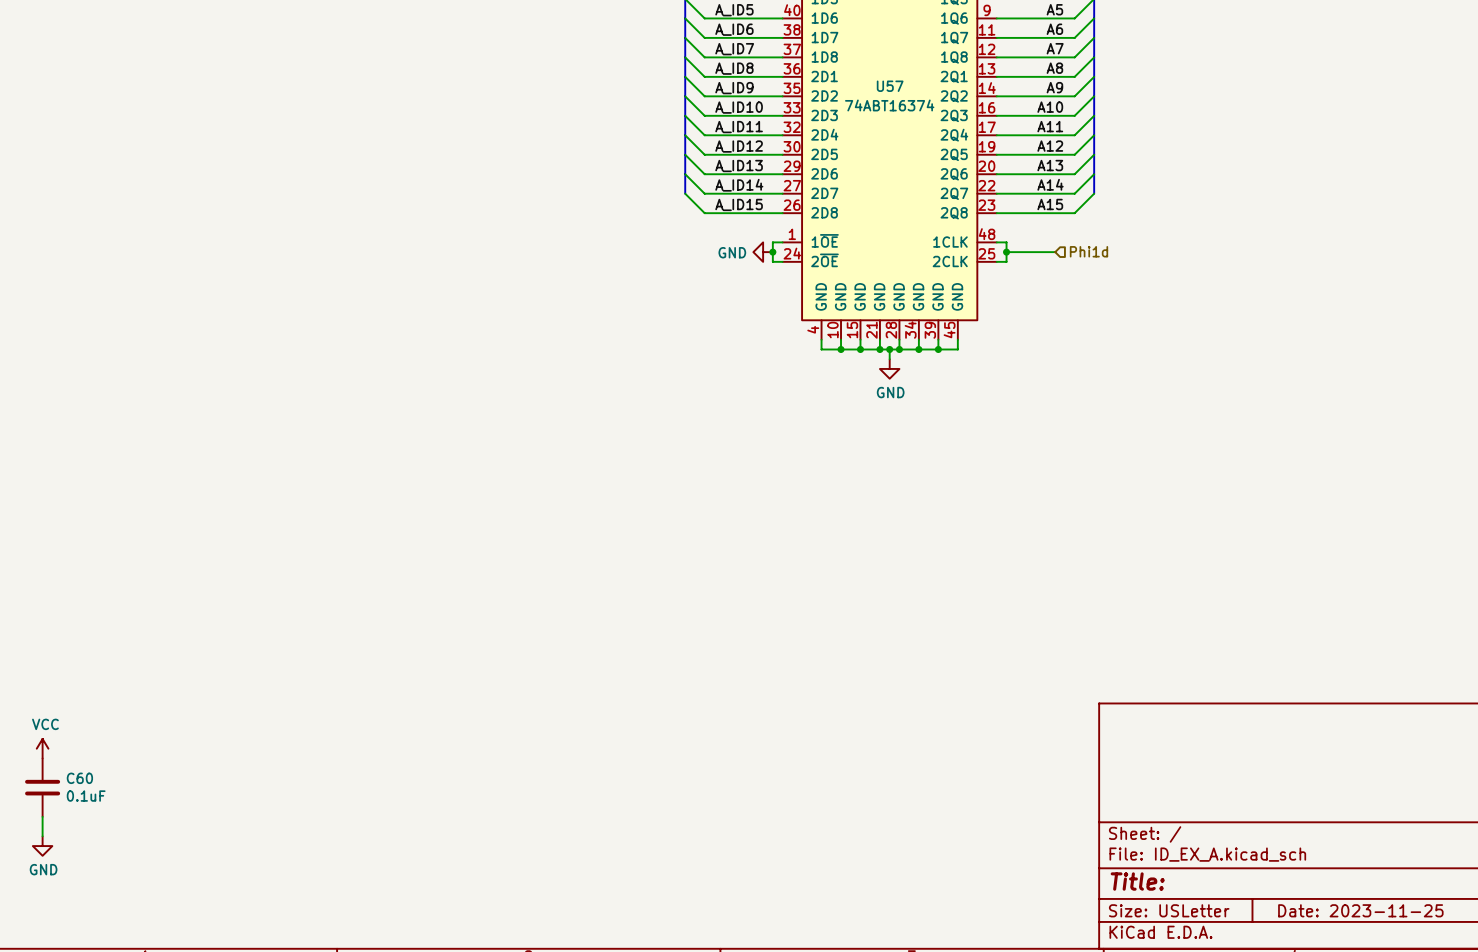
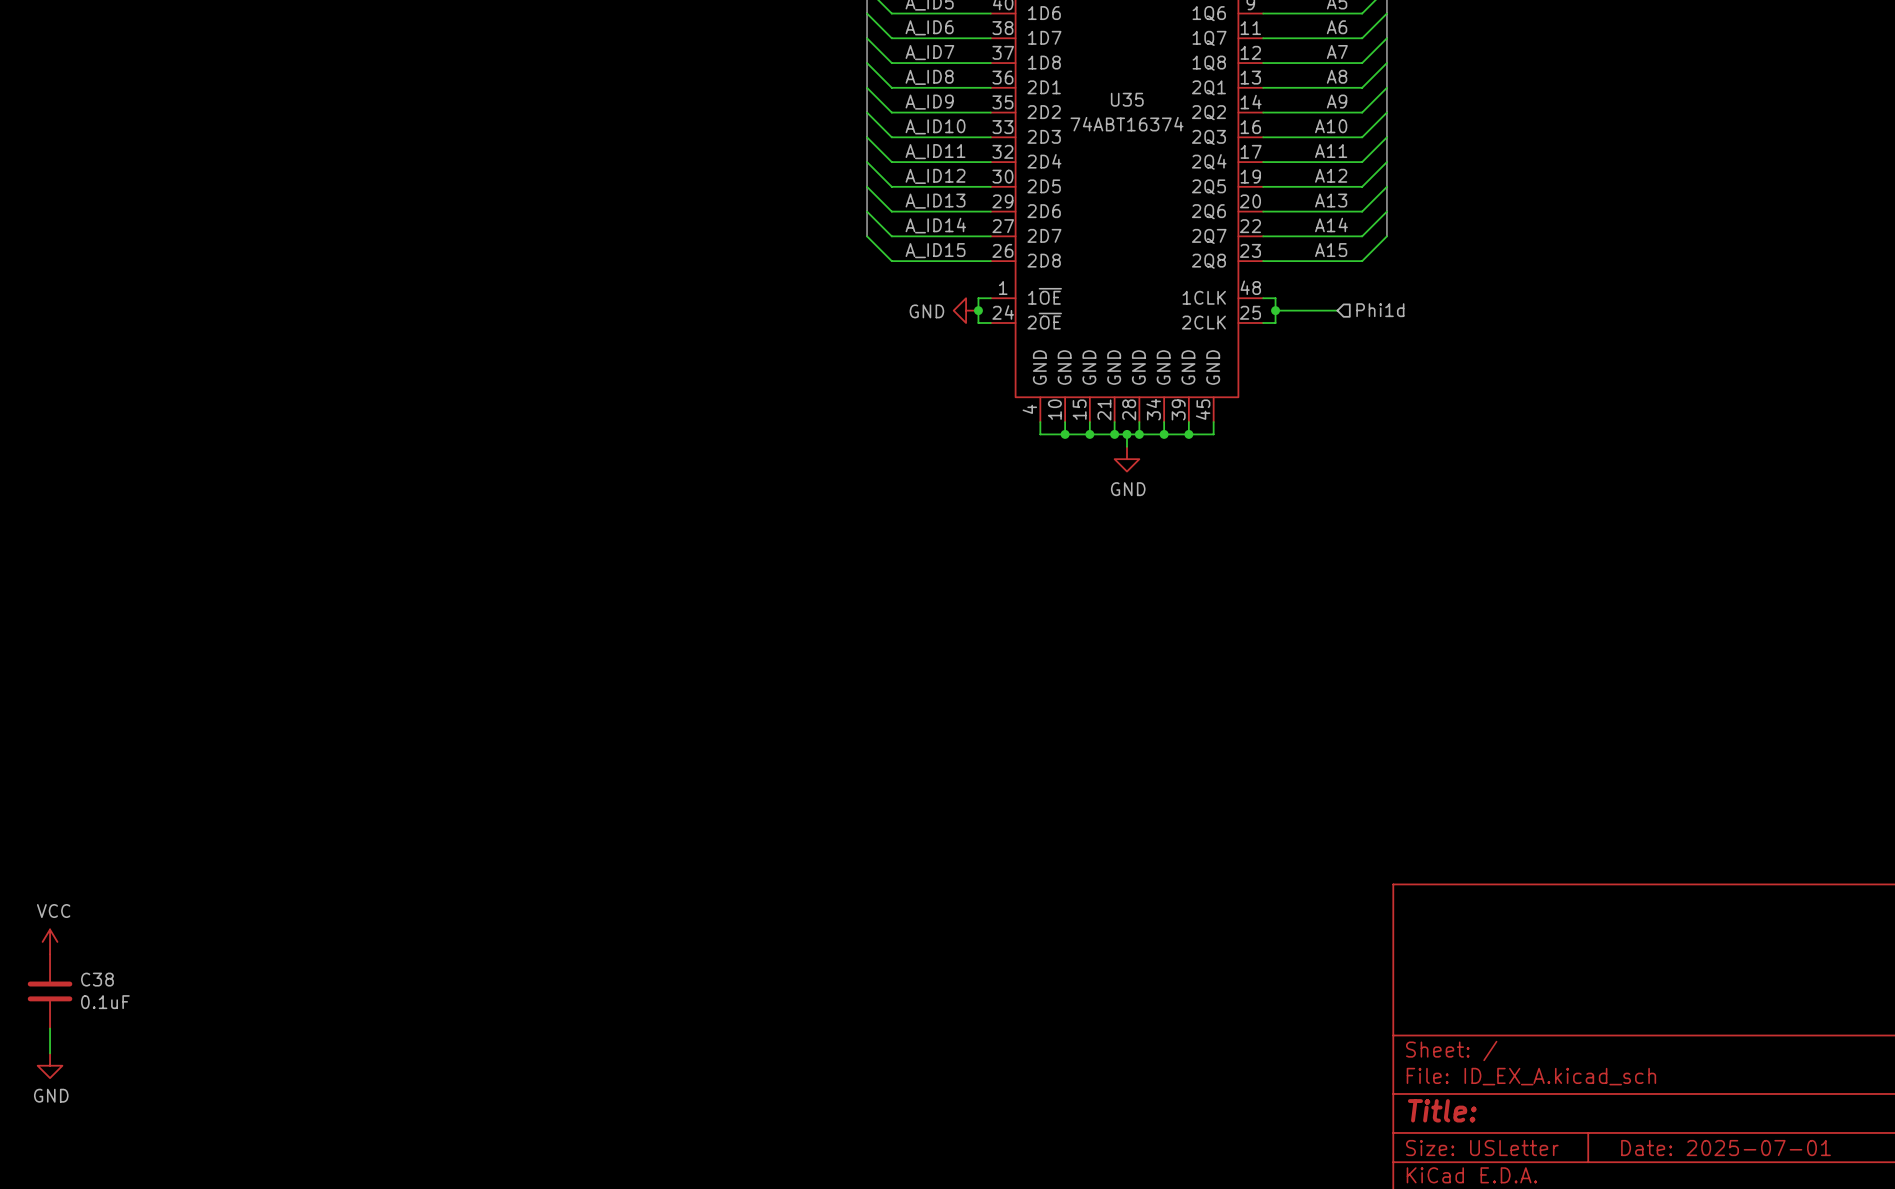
U57 name: U57 (890, 86) -> U35 (1127, 99)
C60 name: C60 (79, 778) -> C38 (97, 979)
title block: Date: 2023-11-25 (1360, 910) -> Date: 2025-07-01 (1726, 1148)

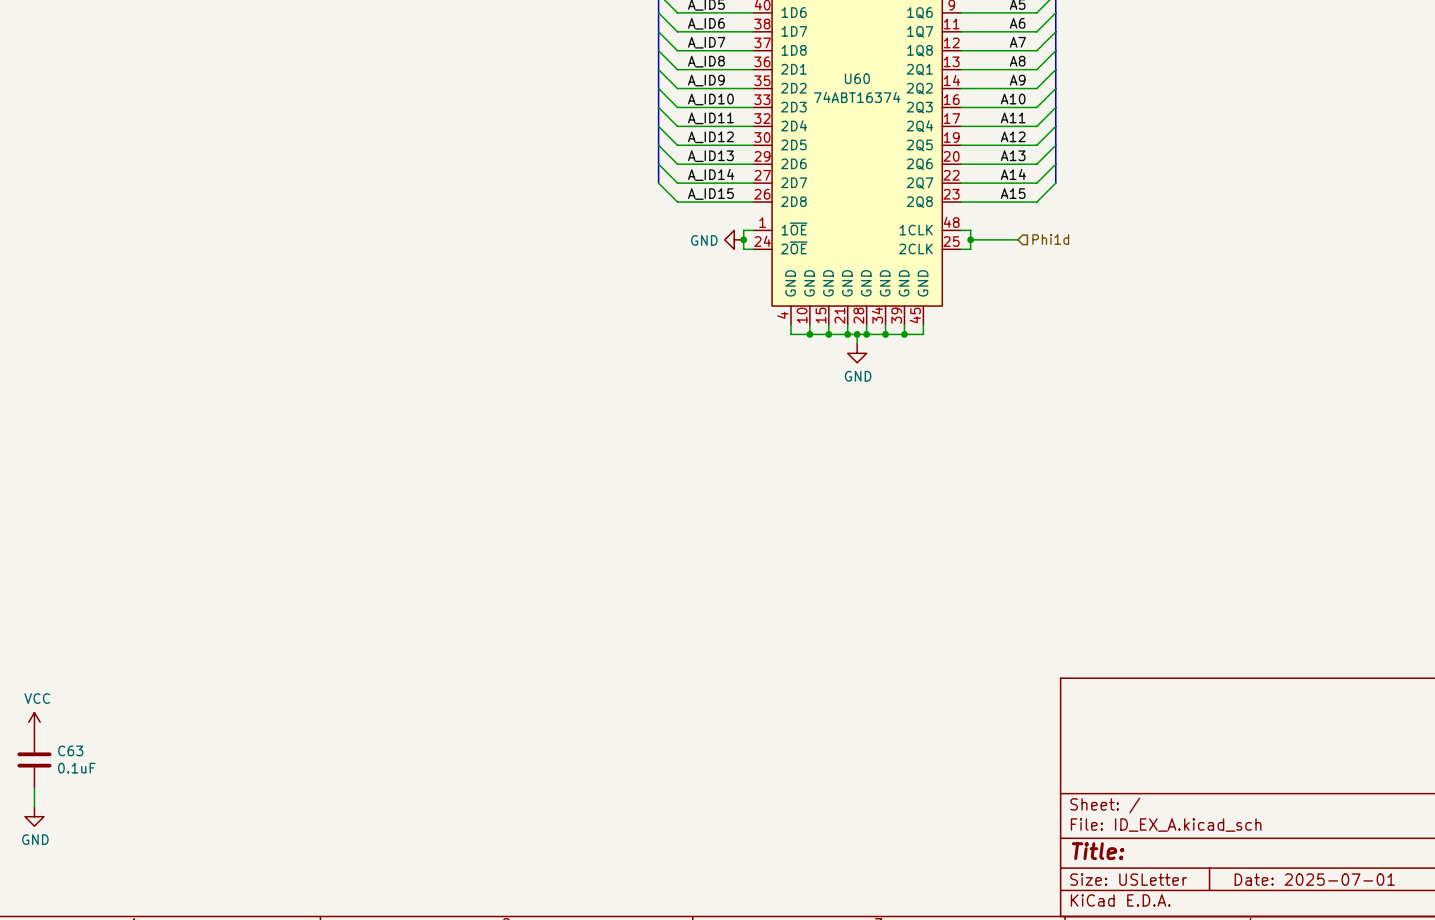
U35 name: U35 (1127, 99) -> U60 (857, 78)
C38 name: C38 (97, 979) -> C63 (70, 750)

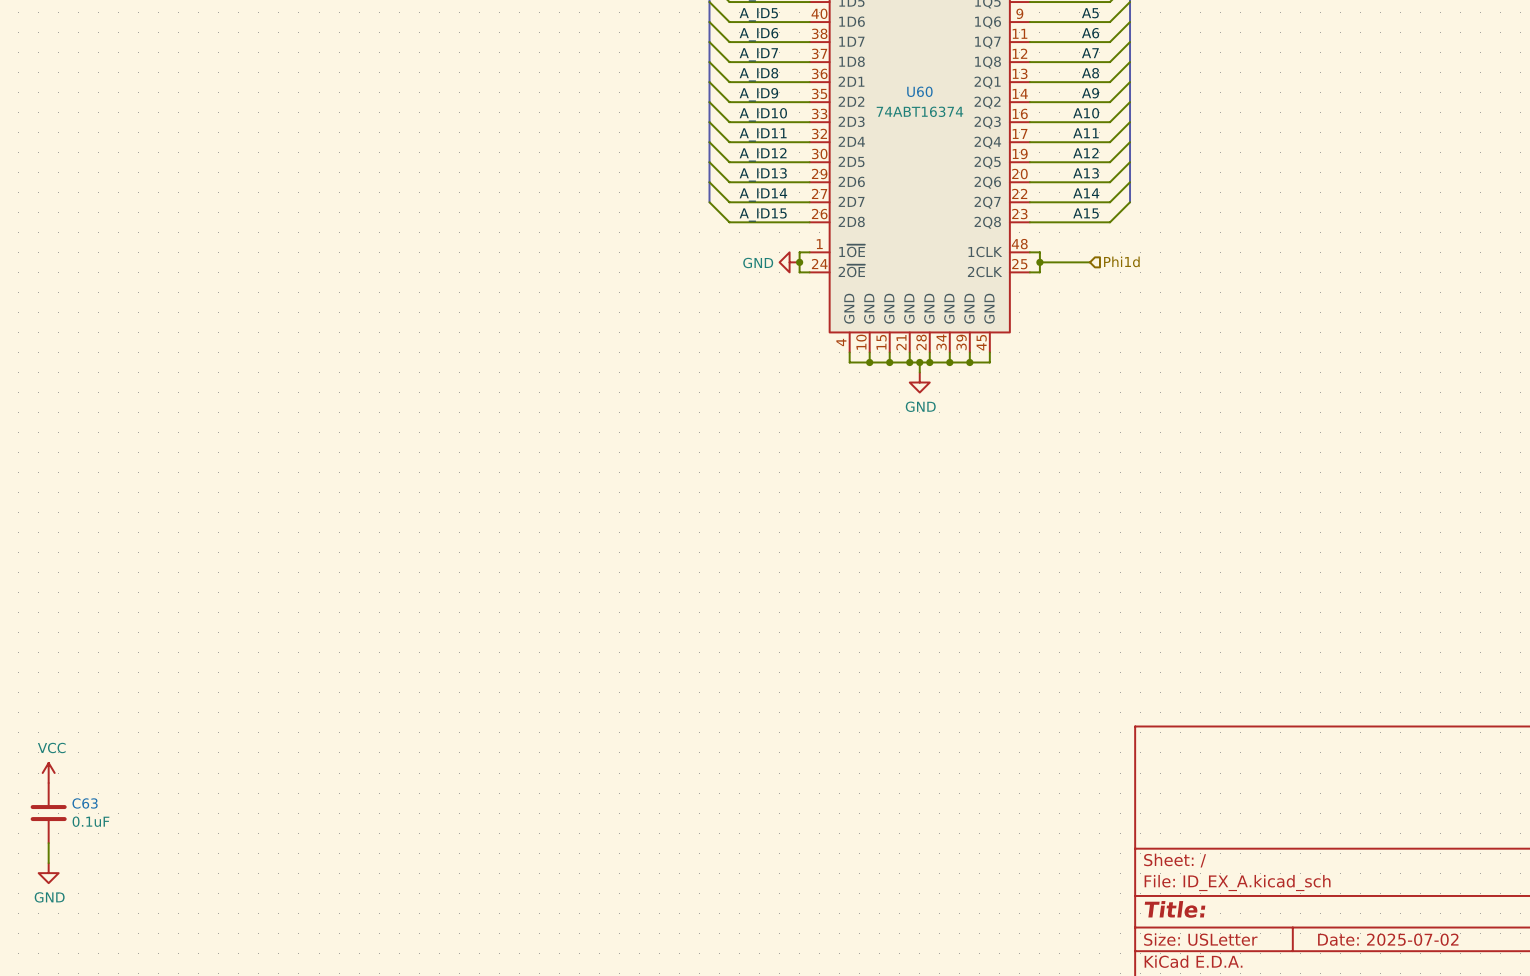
title block: Date: 2025-07-01 (1314, 879) -> Date: 2025-07-02 (1388, 939)

